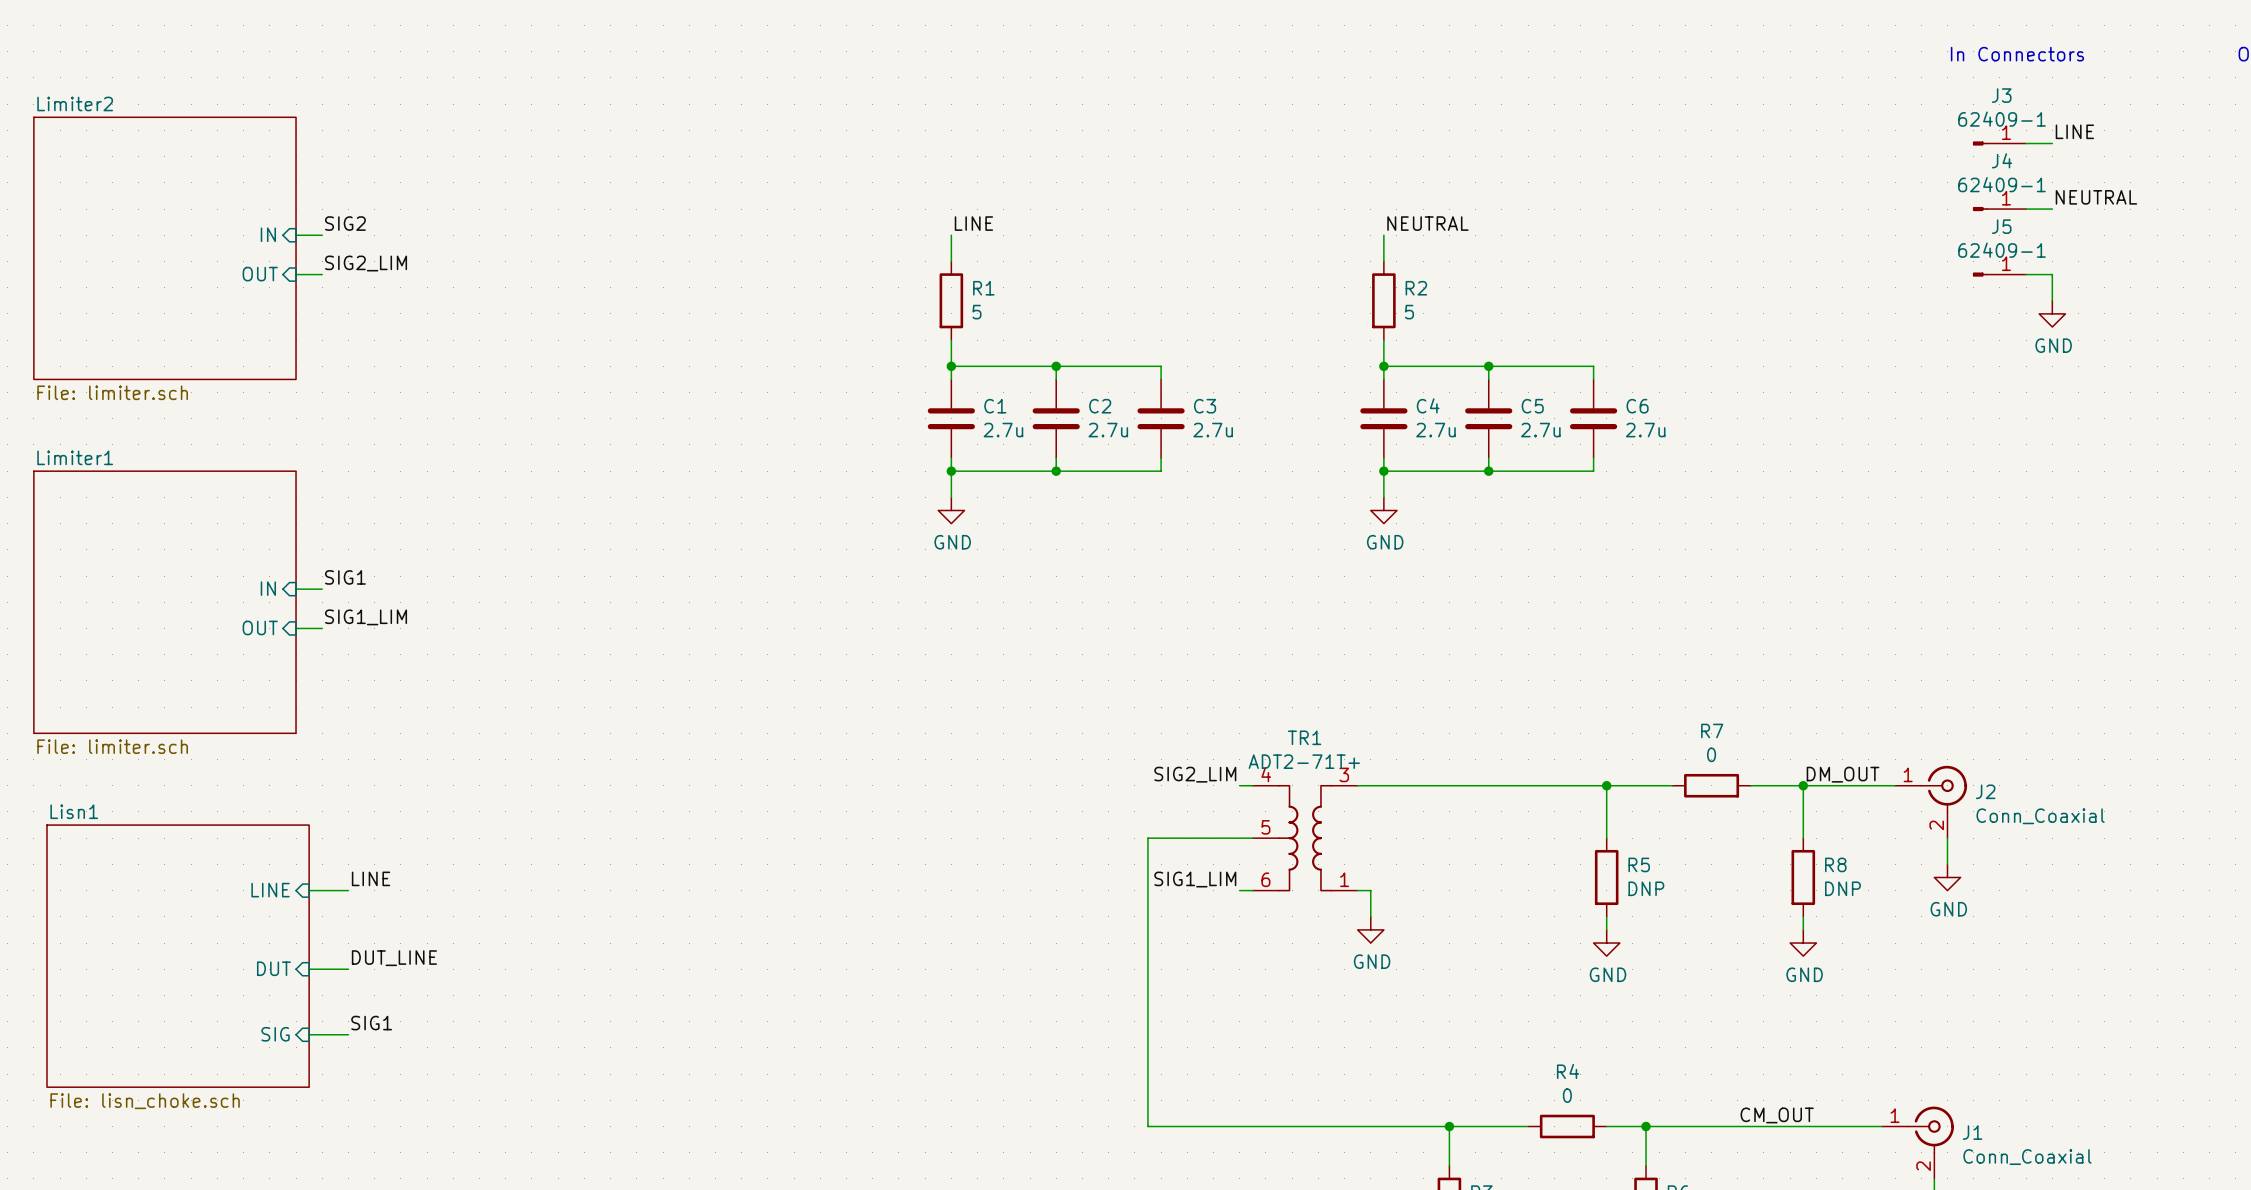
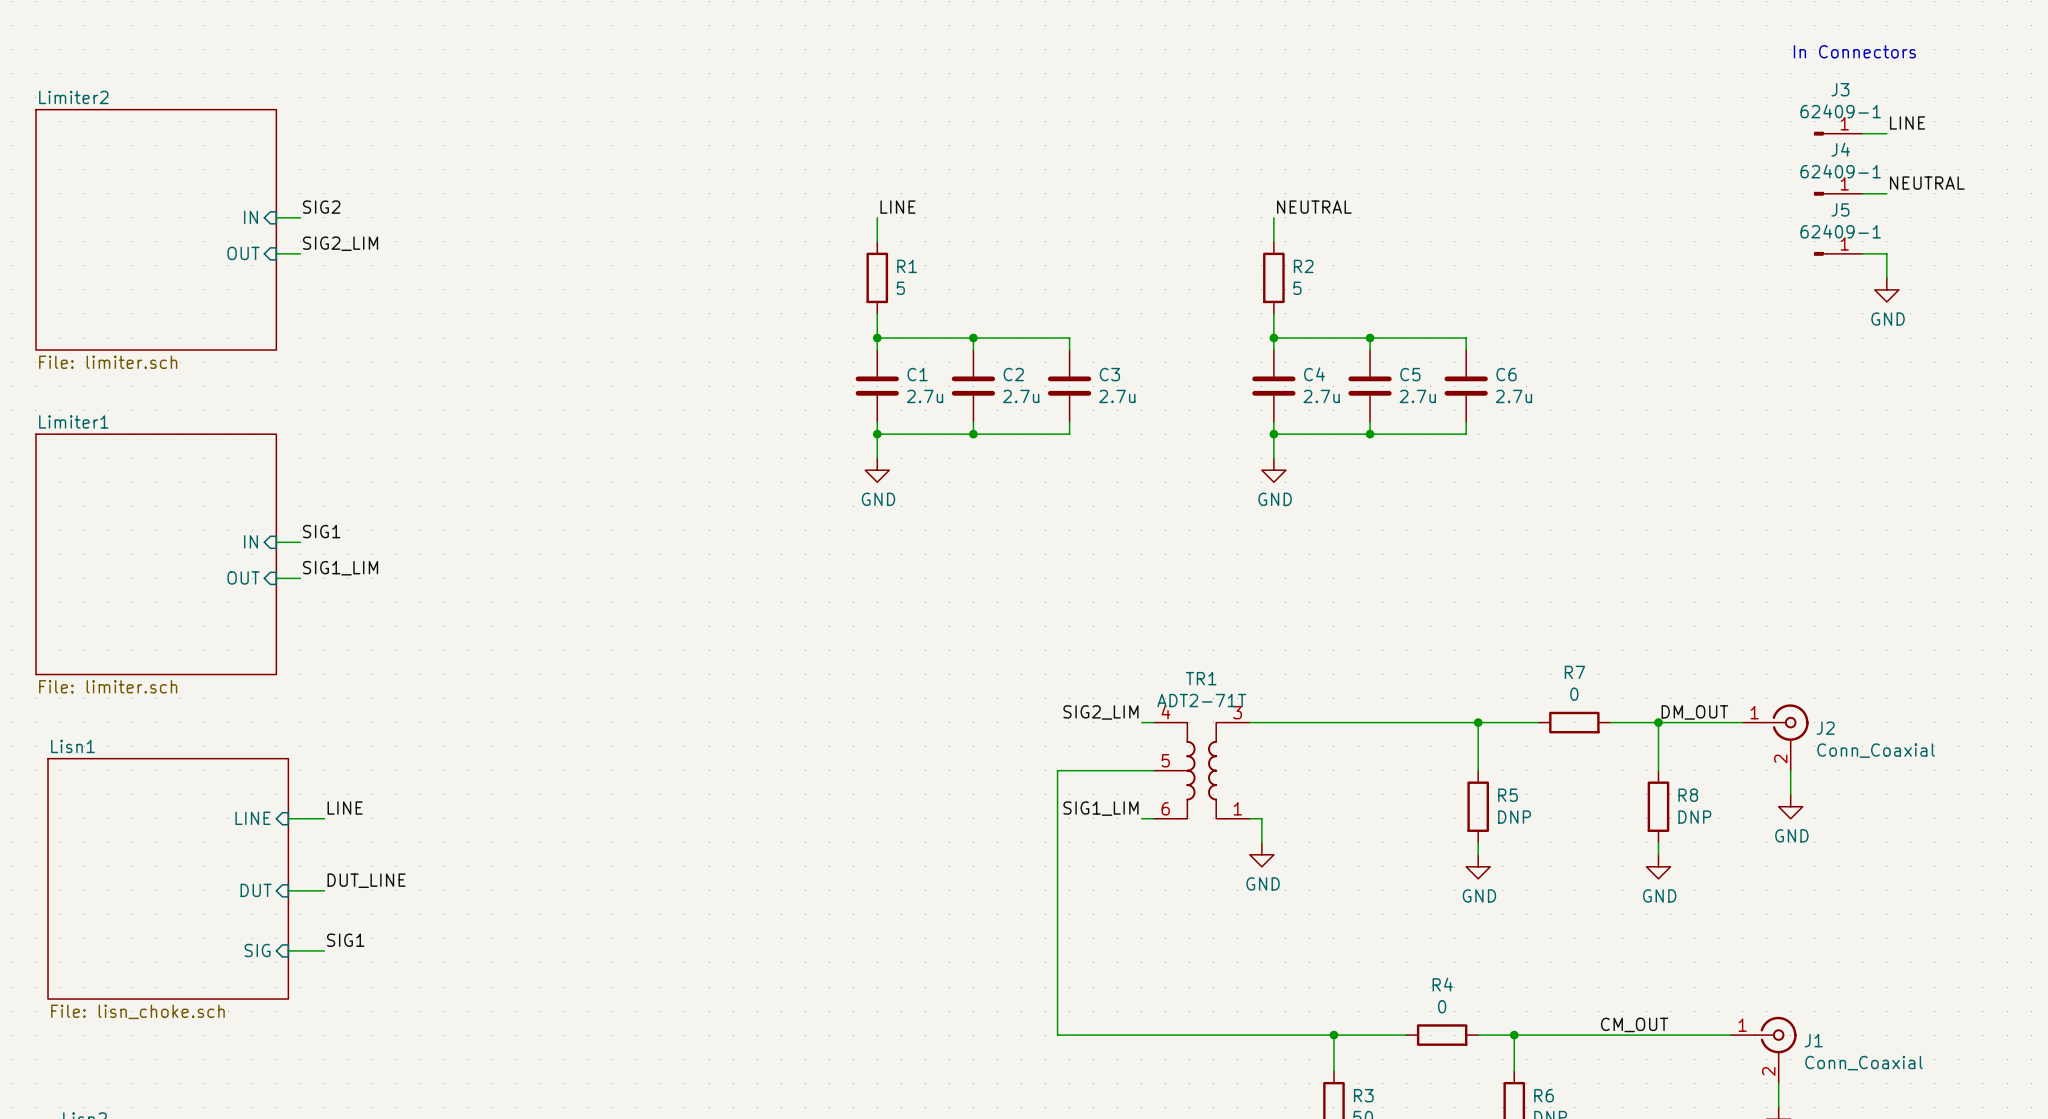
TR1 value: ADT2-71T+ (1304, 761) -> ADT2-71T (1201, 700)

